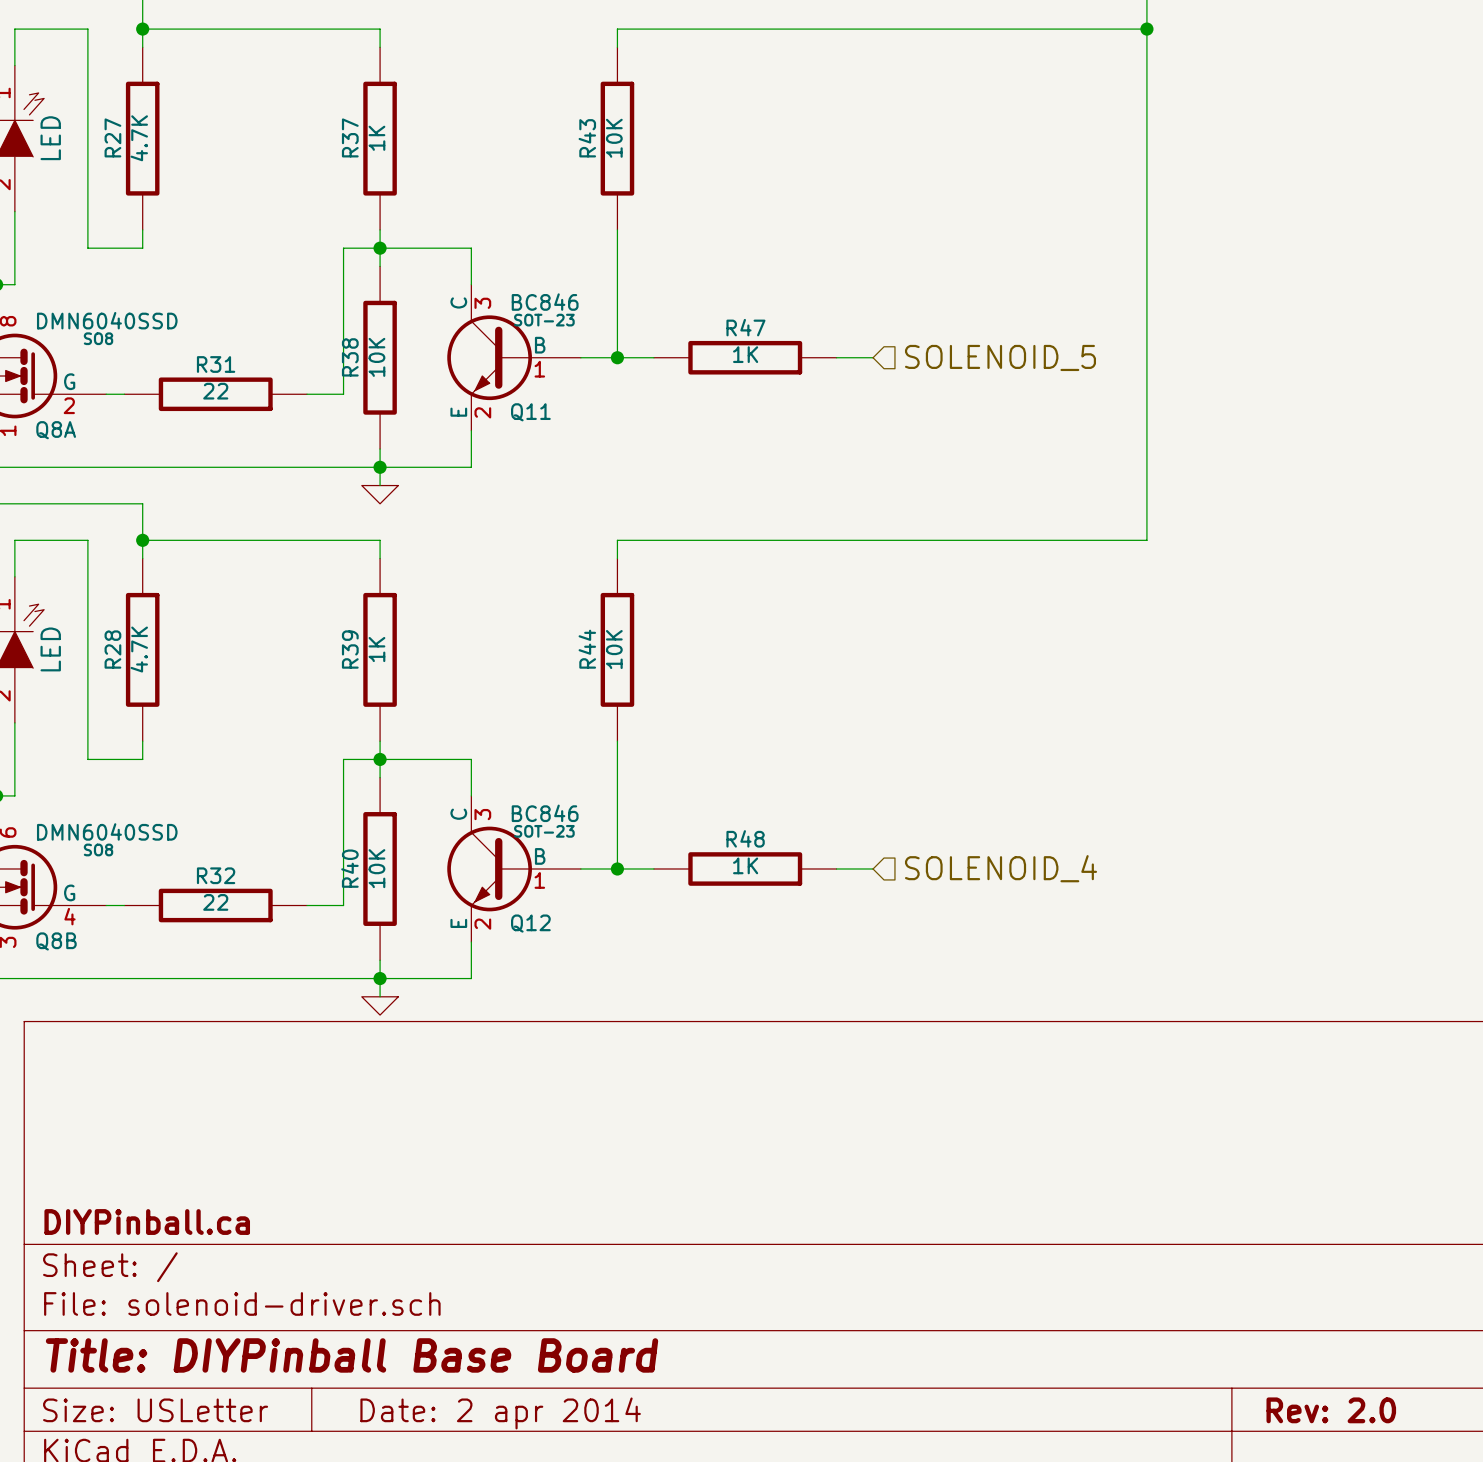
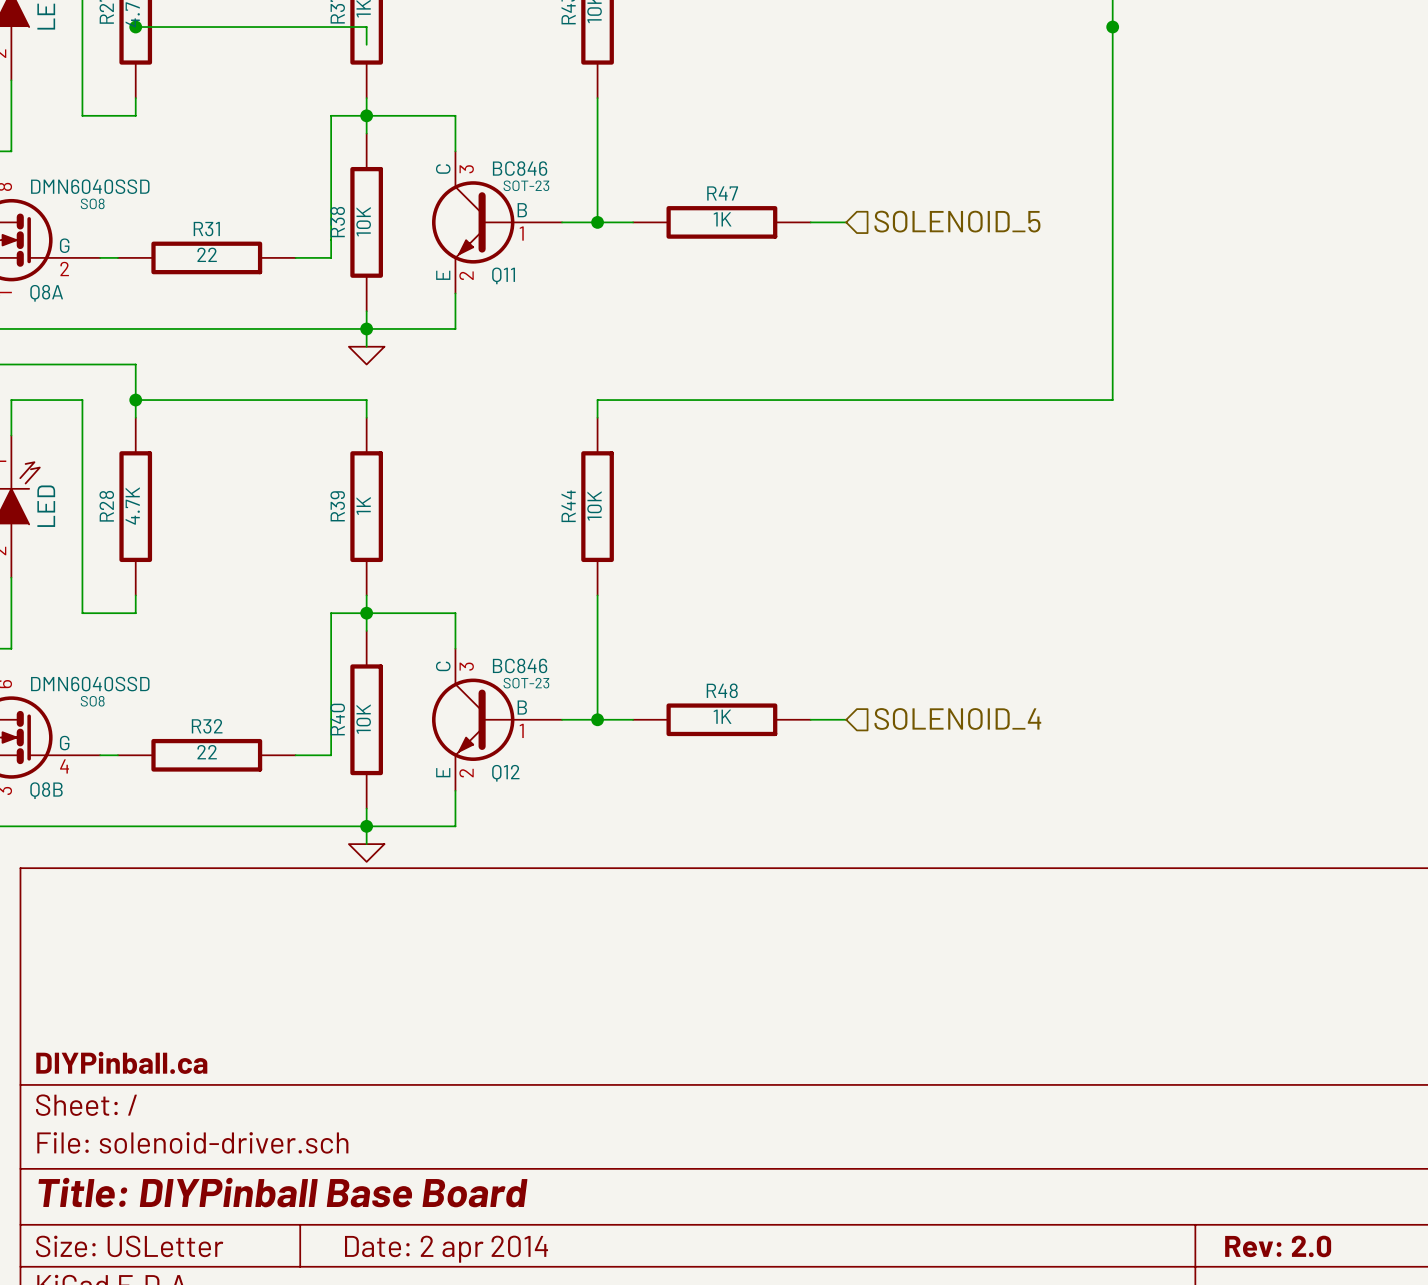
wire: none -> (135, 27) (366, 27) (366, 44)
junction: none -> (135, 27)
junction: none -> (1112, 27)

